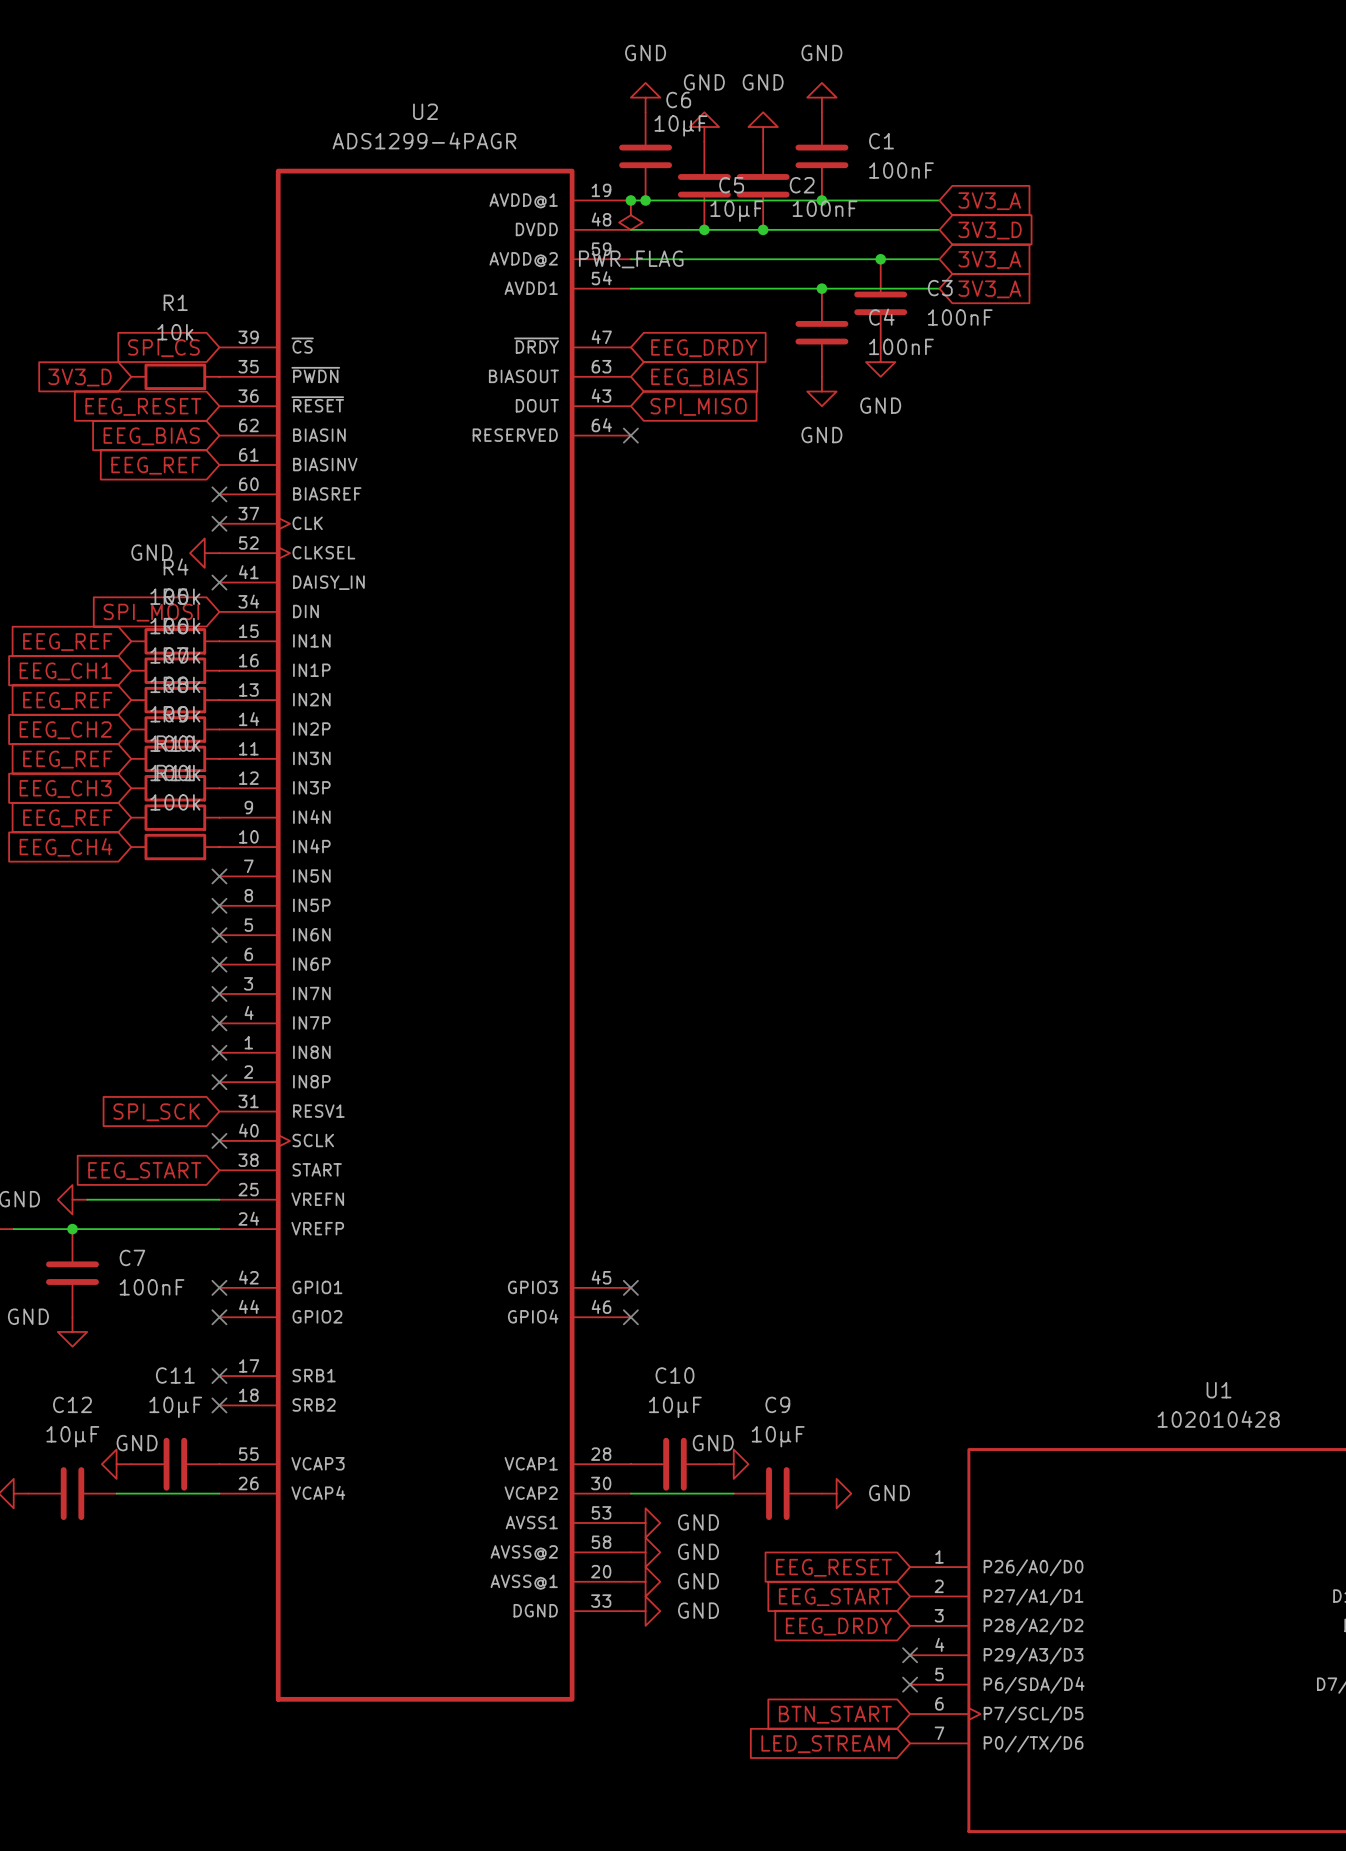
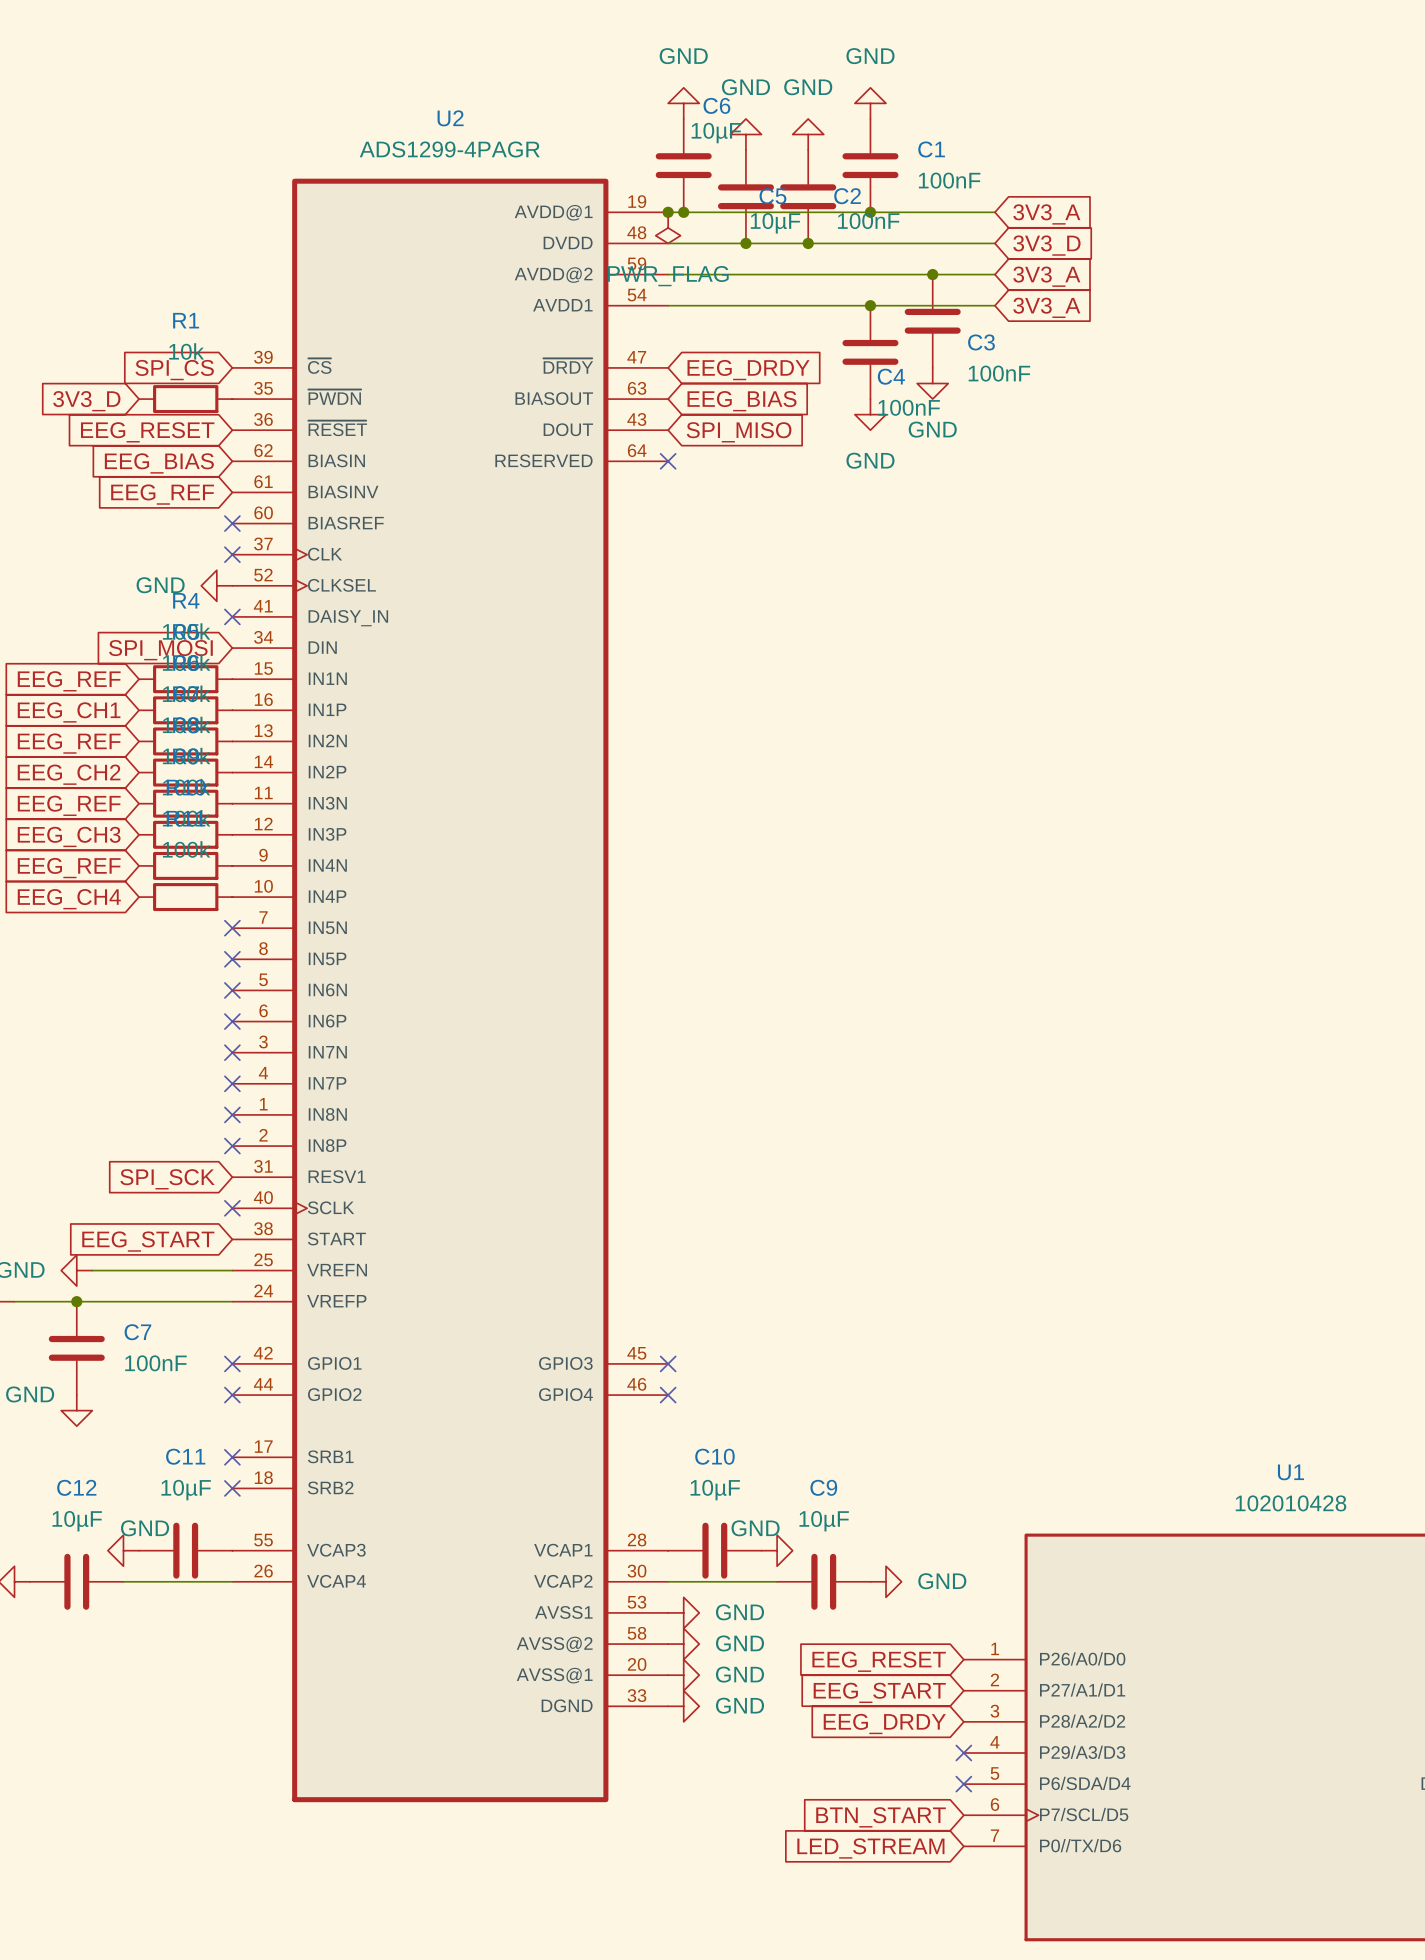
C3 name position: C3 (940, 288) -> C3 (981, 342)
C4 name position: C4 (881, 317) -> C4 (891, 376)
C3 value position: 100nF (960, 317) -> 100nF (999, 373)
C4 value position: 100nF (901, 346) -> 100nF (909, 407)

